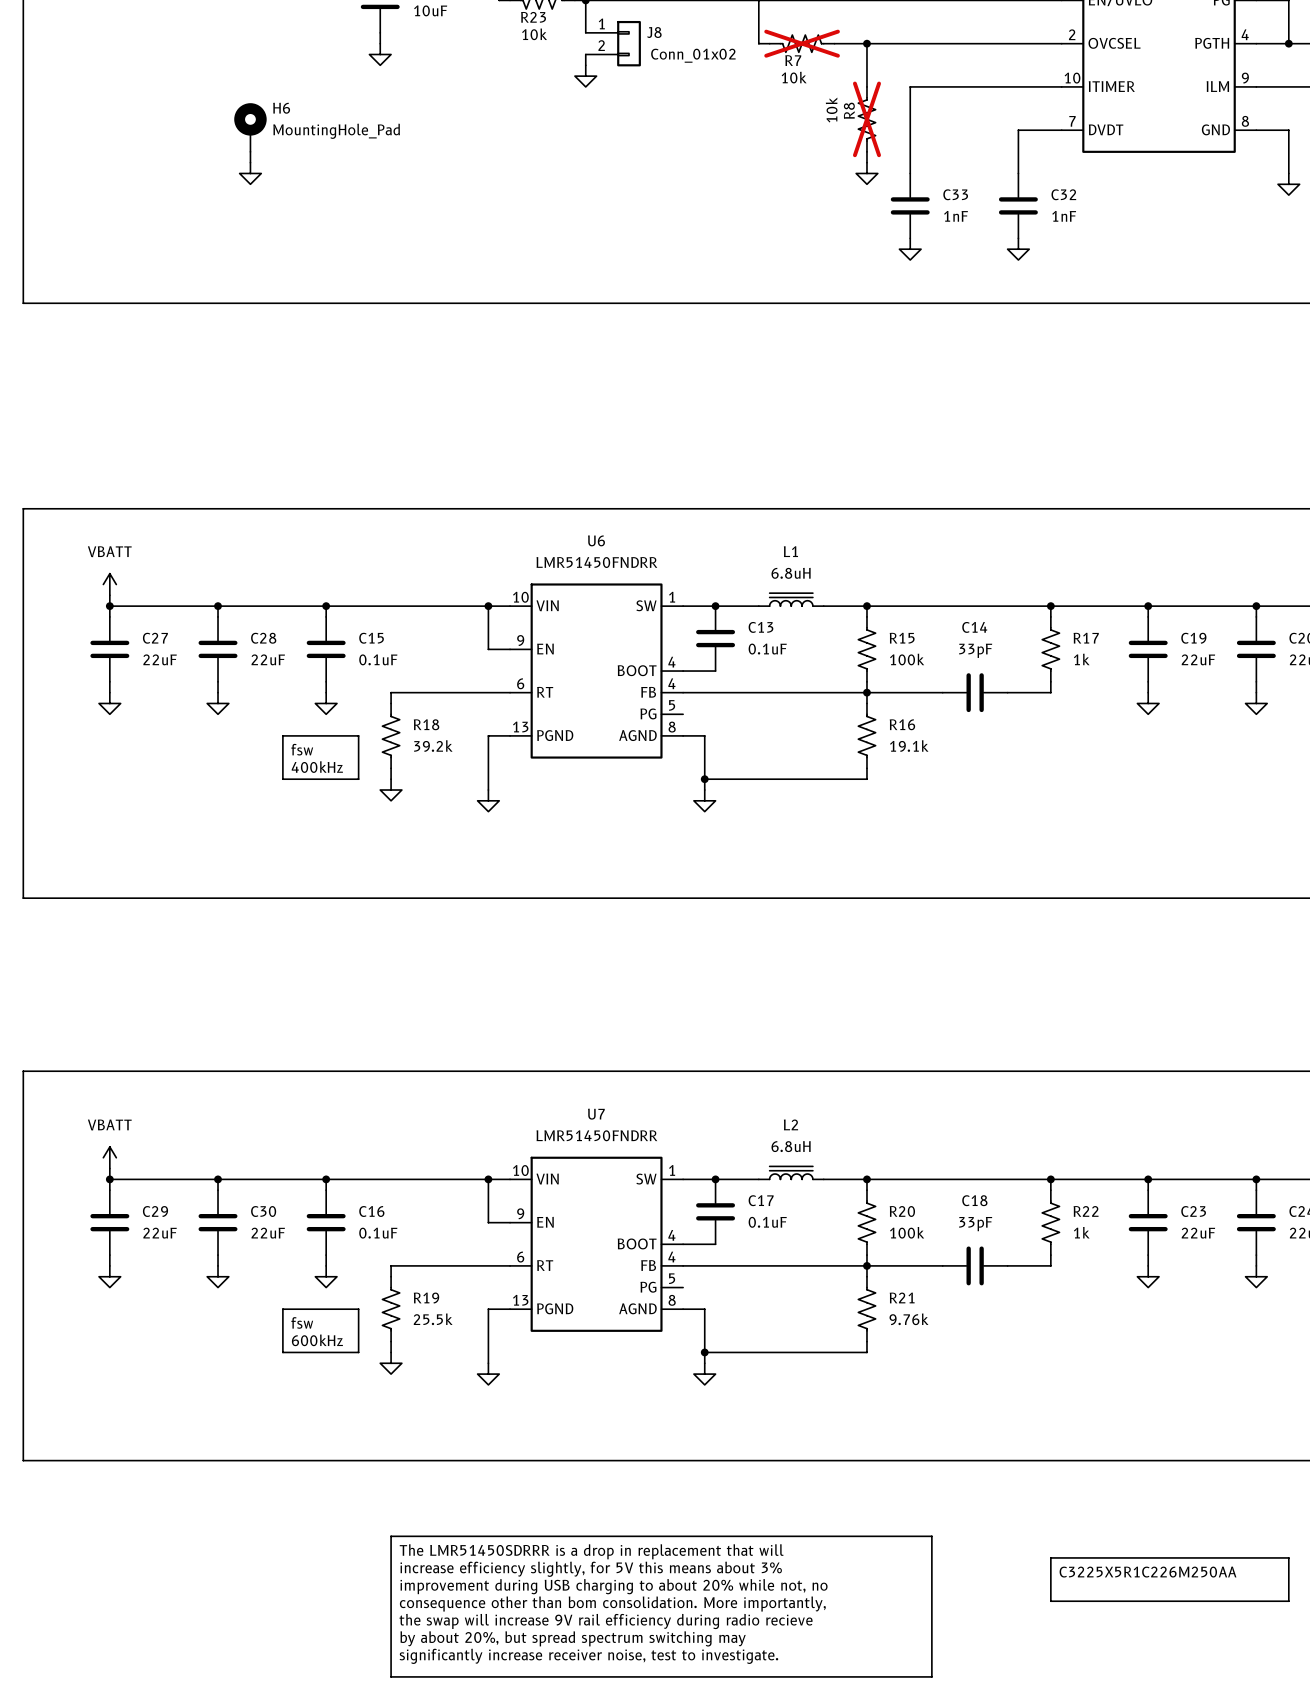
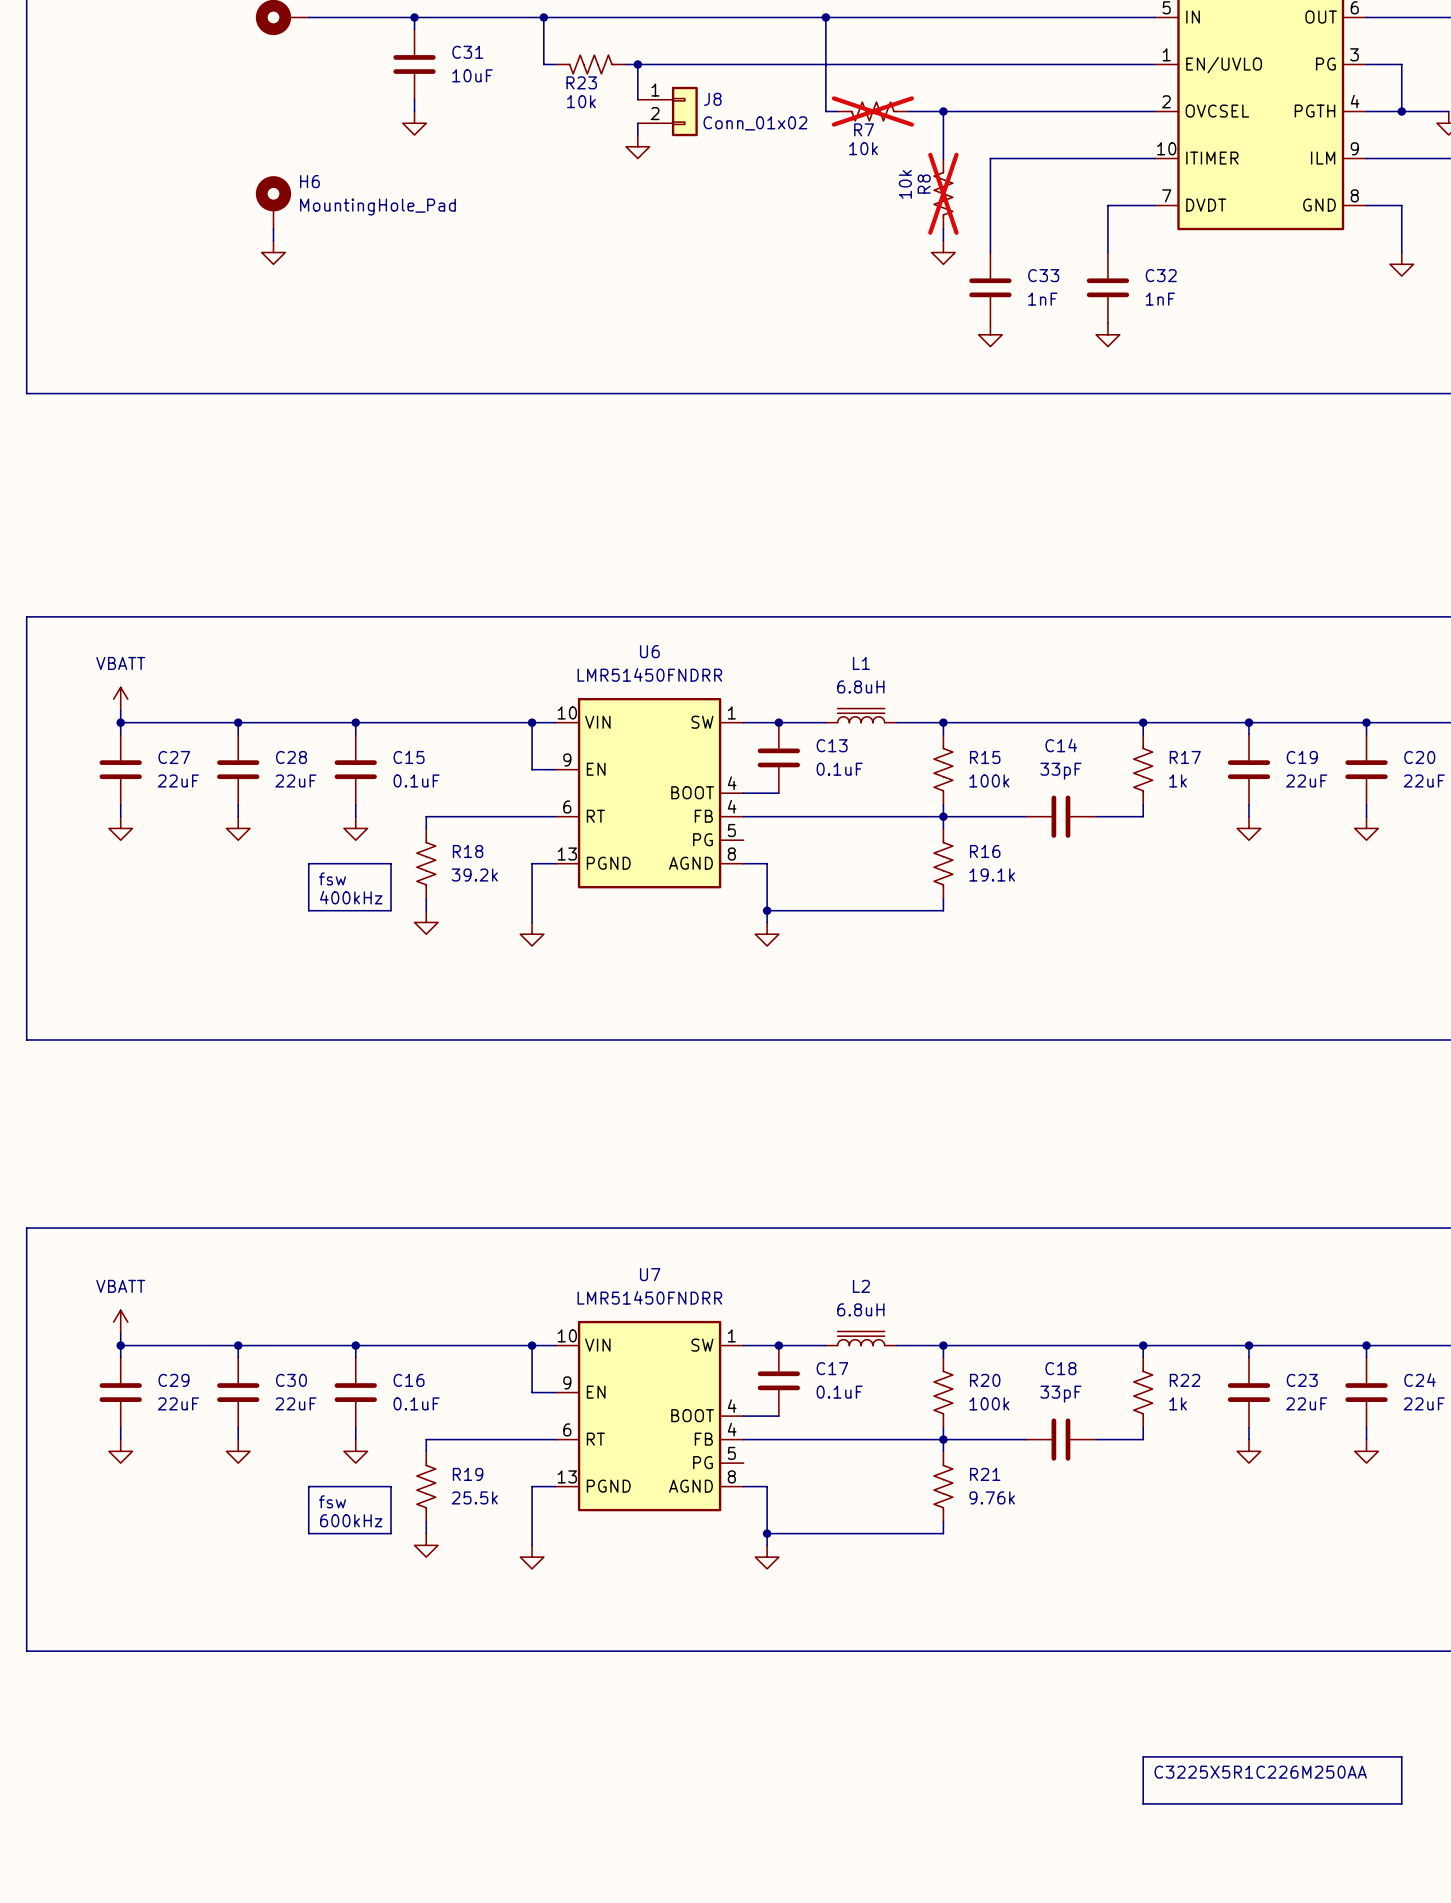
line: (391, 1536) (931, 1536) (931, 1676) (391, 1676) (391, 1536) -> none
text: The LMR51450SDRRR is a drop in replacement that will (591, 1551) -> none
text: increase efficiency slightly, for 5V this means about 3% (591, 1569) -> none
text: improvement during USB charging to about 20% while not, no (614, 1586) -> none
text: consequence other than bom consolidation. More importantly, (612, 1604) -> none
text: the swap will increase 9V rail efficiency during radio recieve (606, 1621) -> none
text: by about 20%, but spread spectrum switching may (573, 1638) -> none
text: significantly increase receiver noise, test to investigate. (588, 1656) -> none

